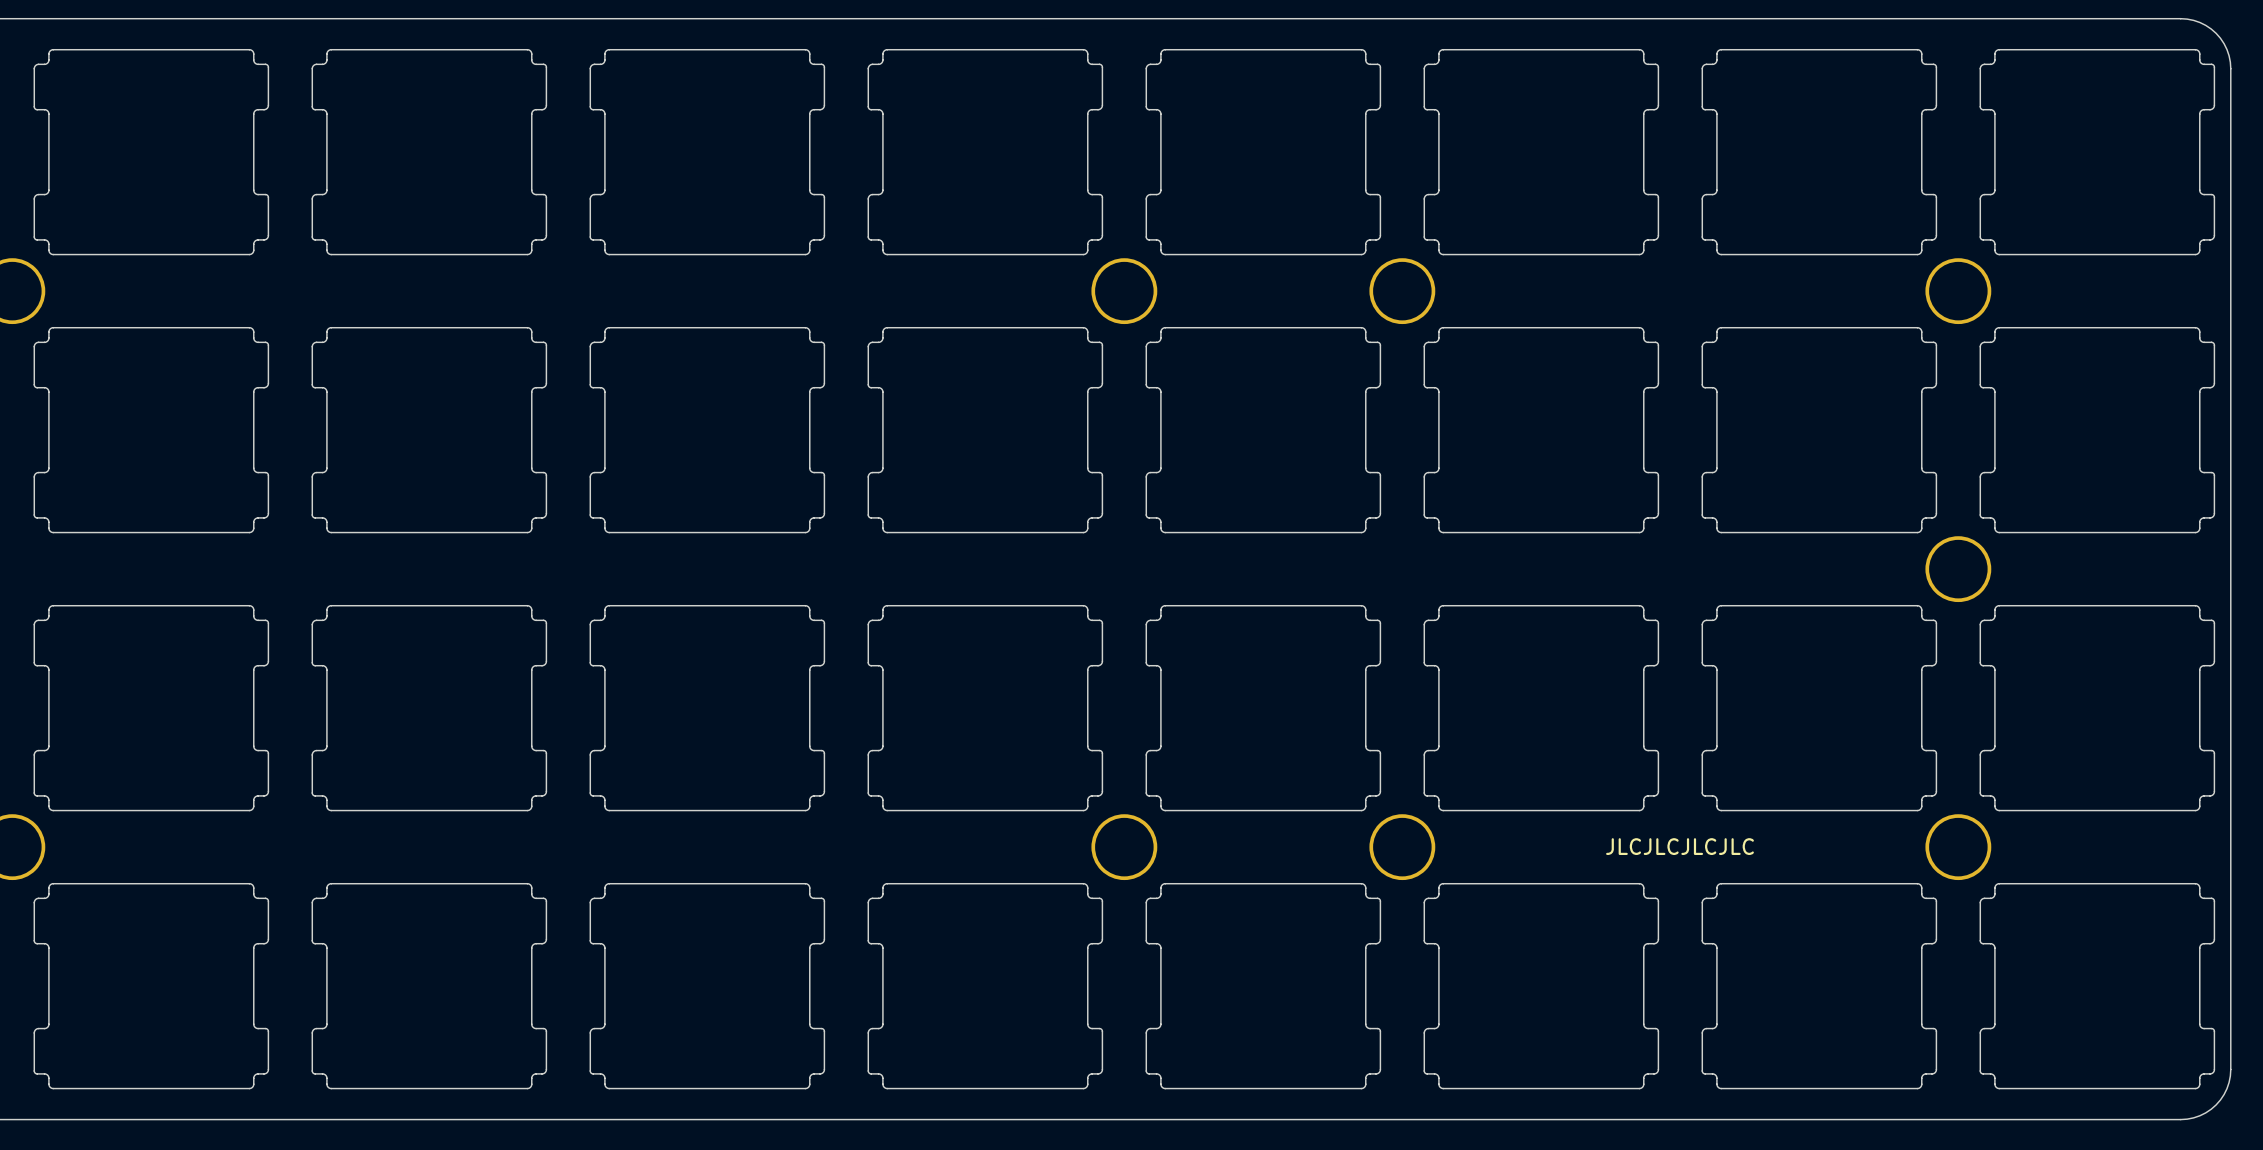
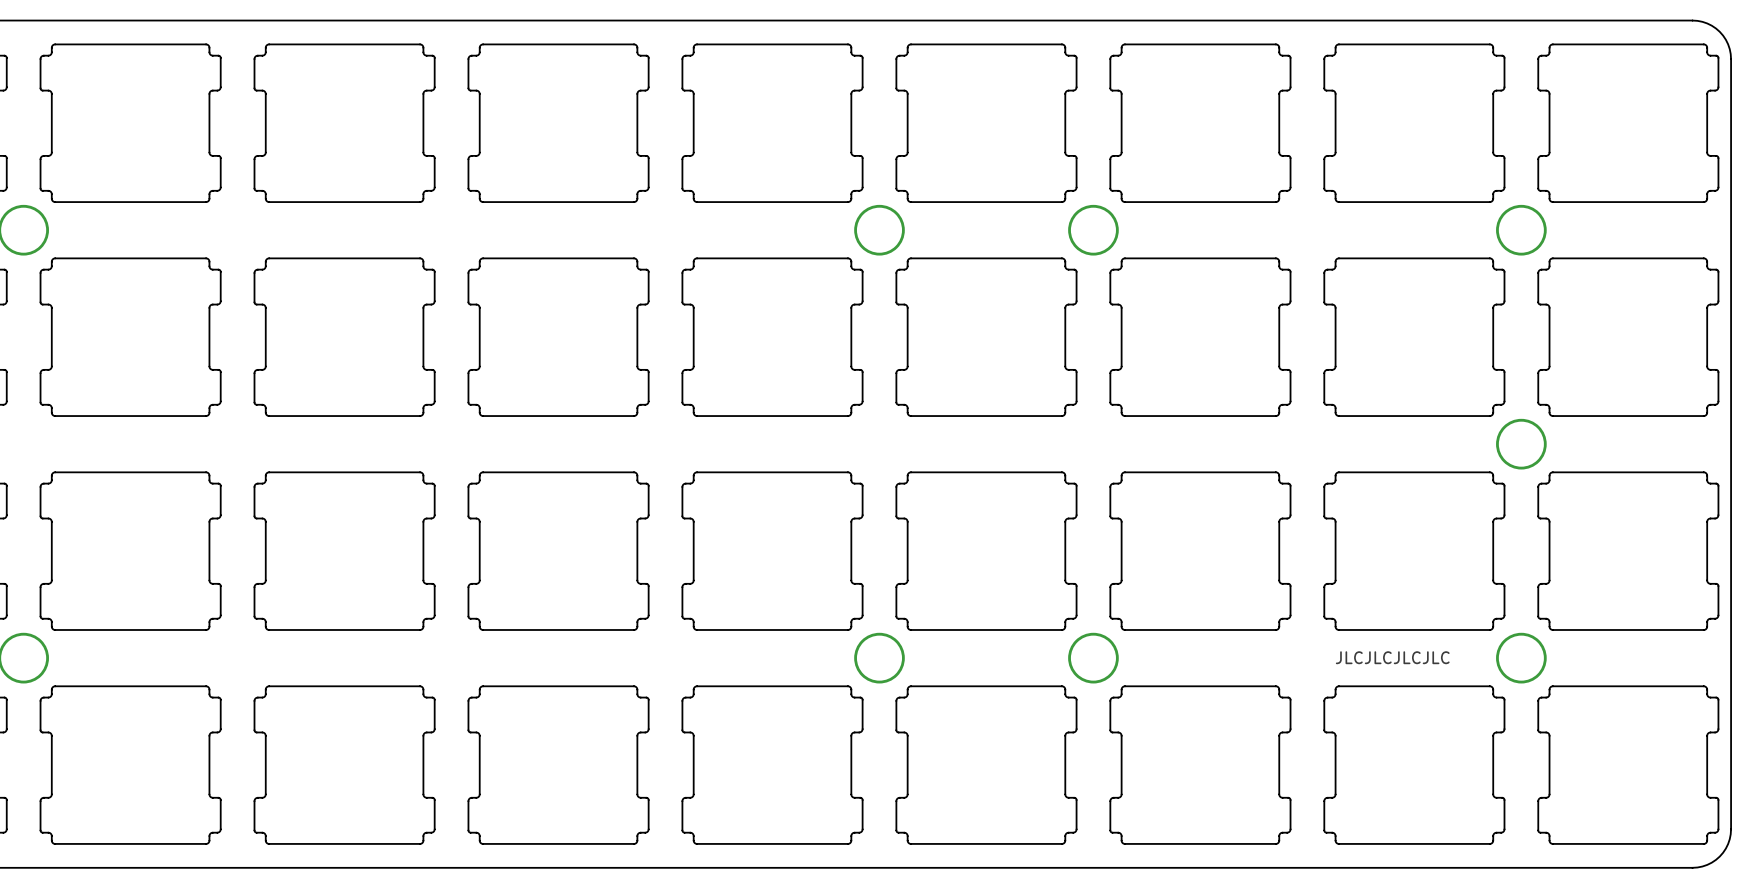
text position: JLCJLCJLCJLC (1680, 846) -> JLCJLCJLCJLC (1392, 657)

